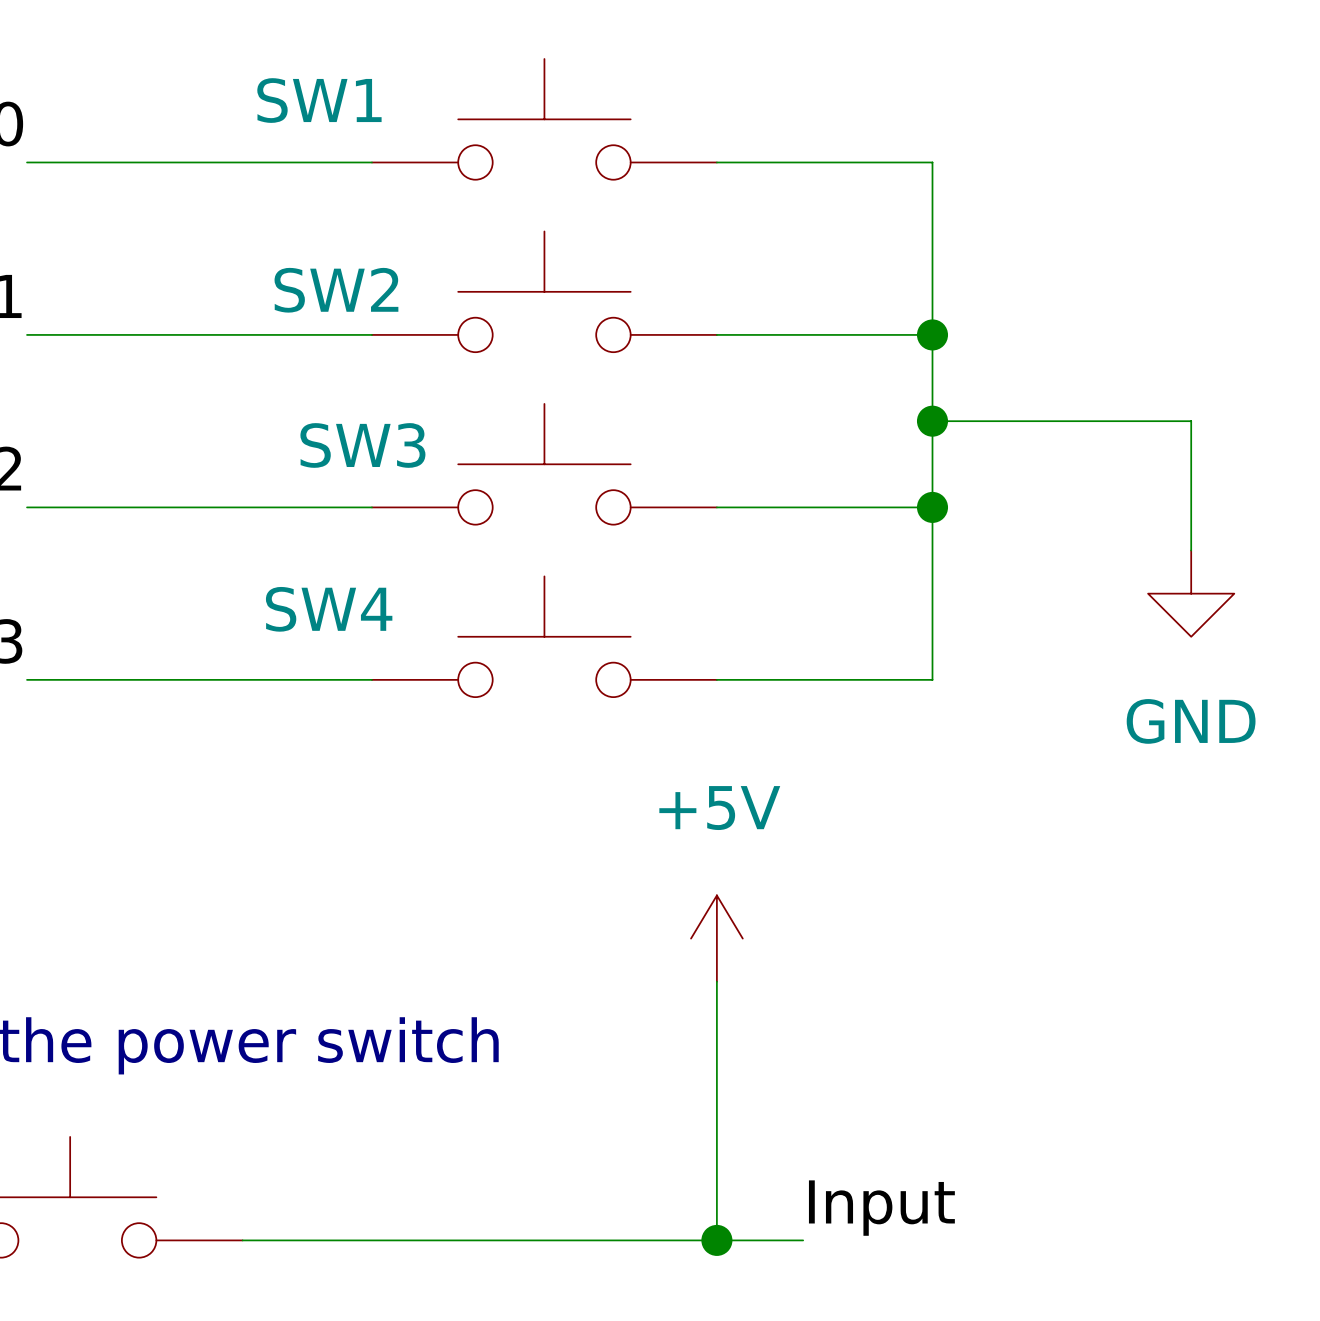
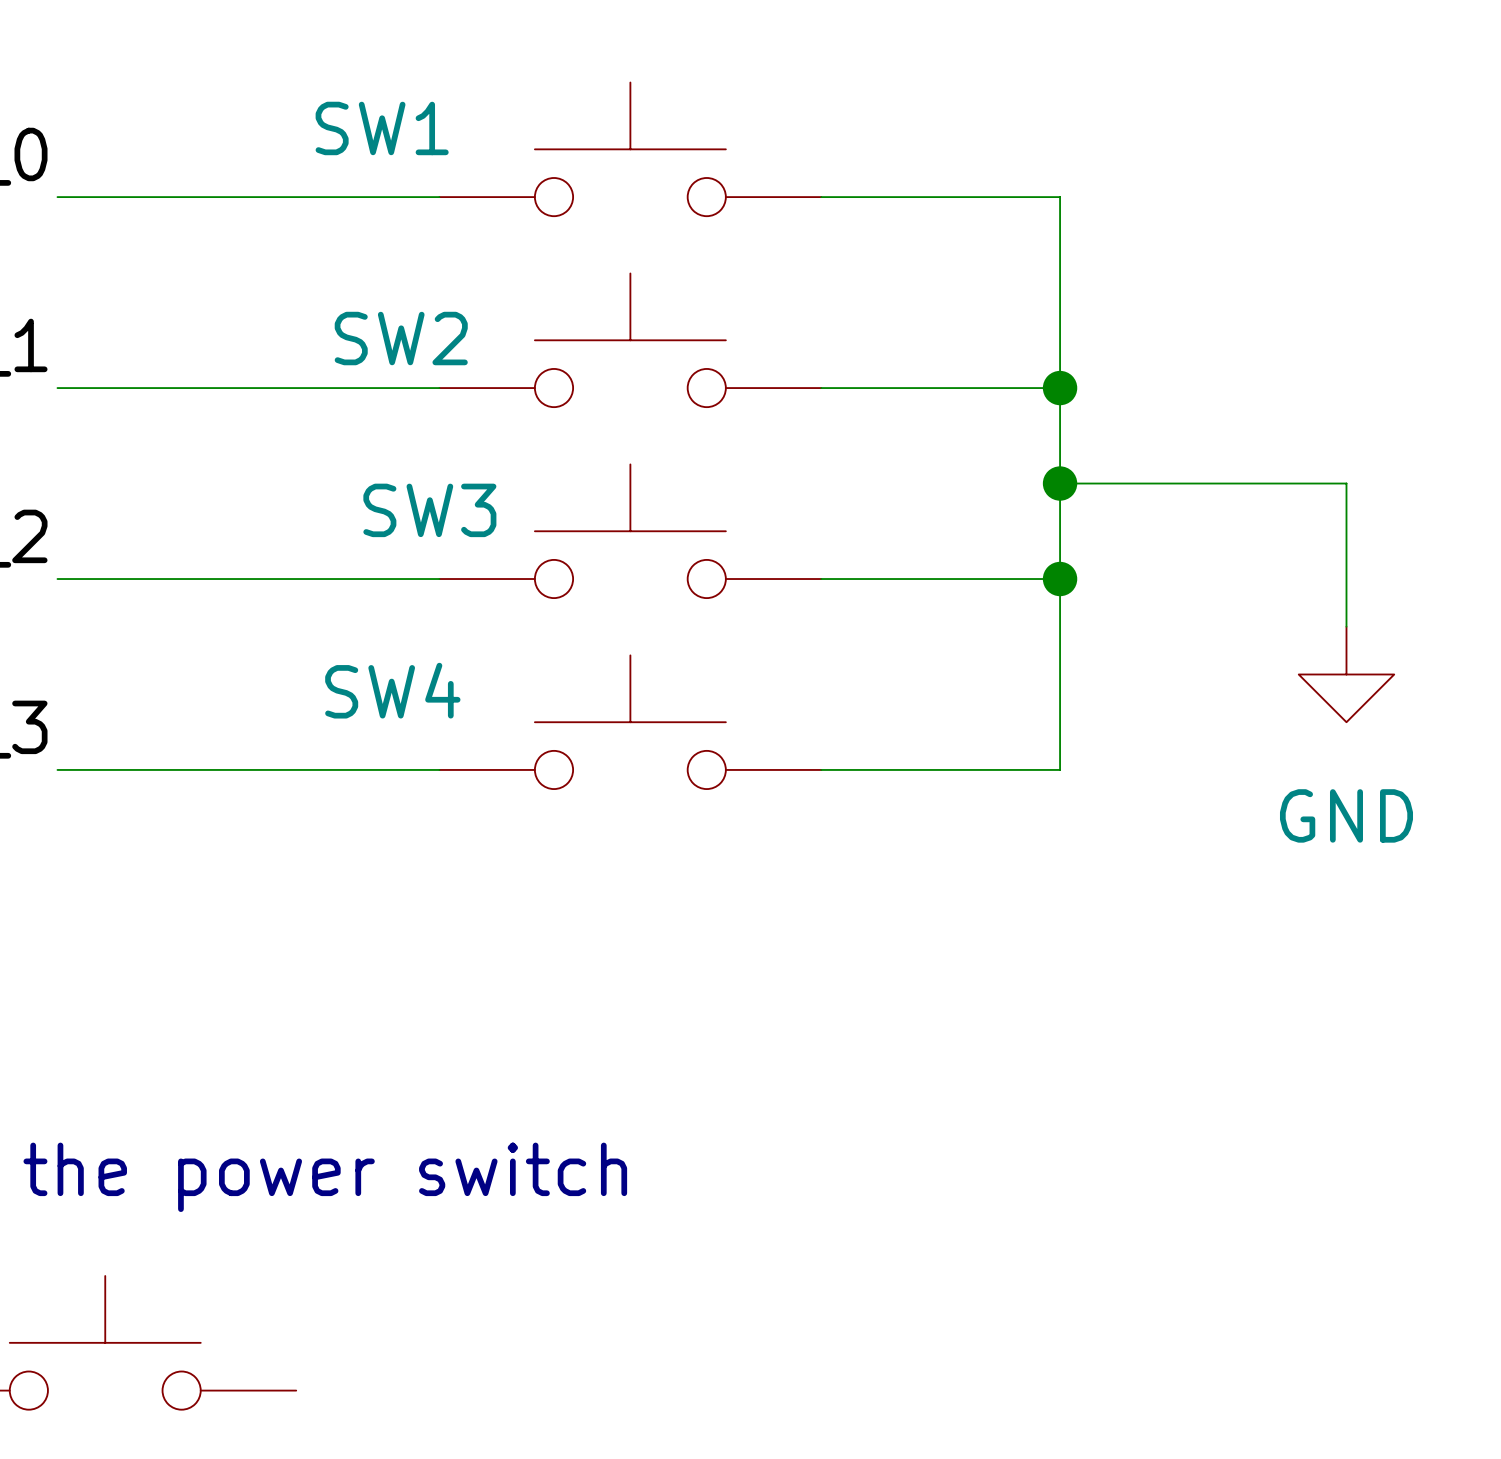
power symbol: +5V (716, 938) -> none
wire: (716, 981) (716, 1240) -> none
label: Input (881, 1208) -> none
wire: (242, 1240) (803, 1240) -> none
junction: (716, 1240) -> none

